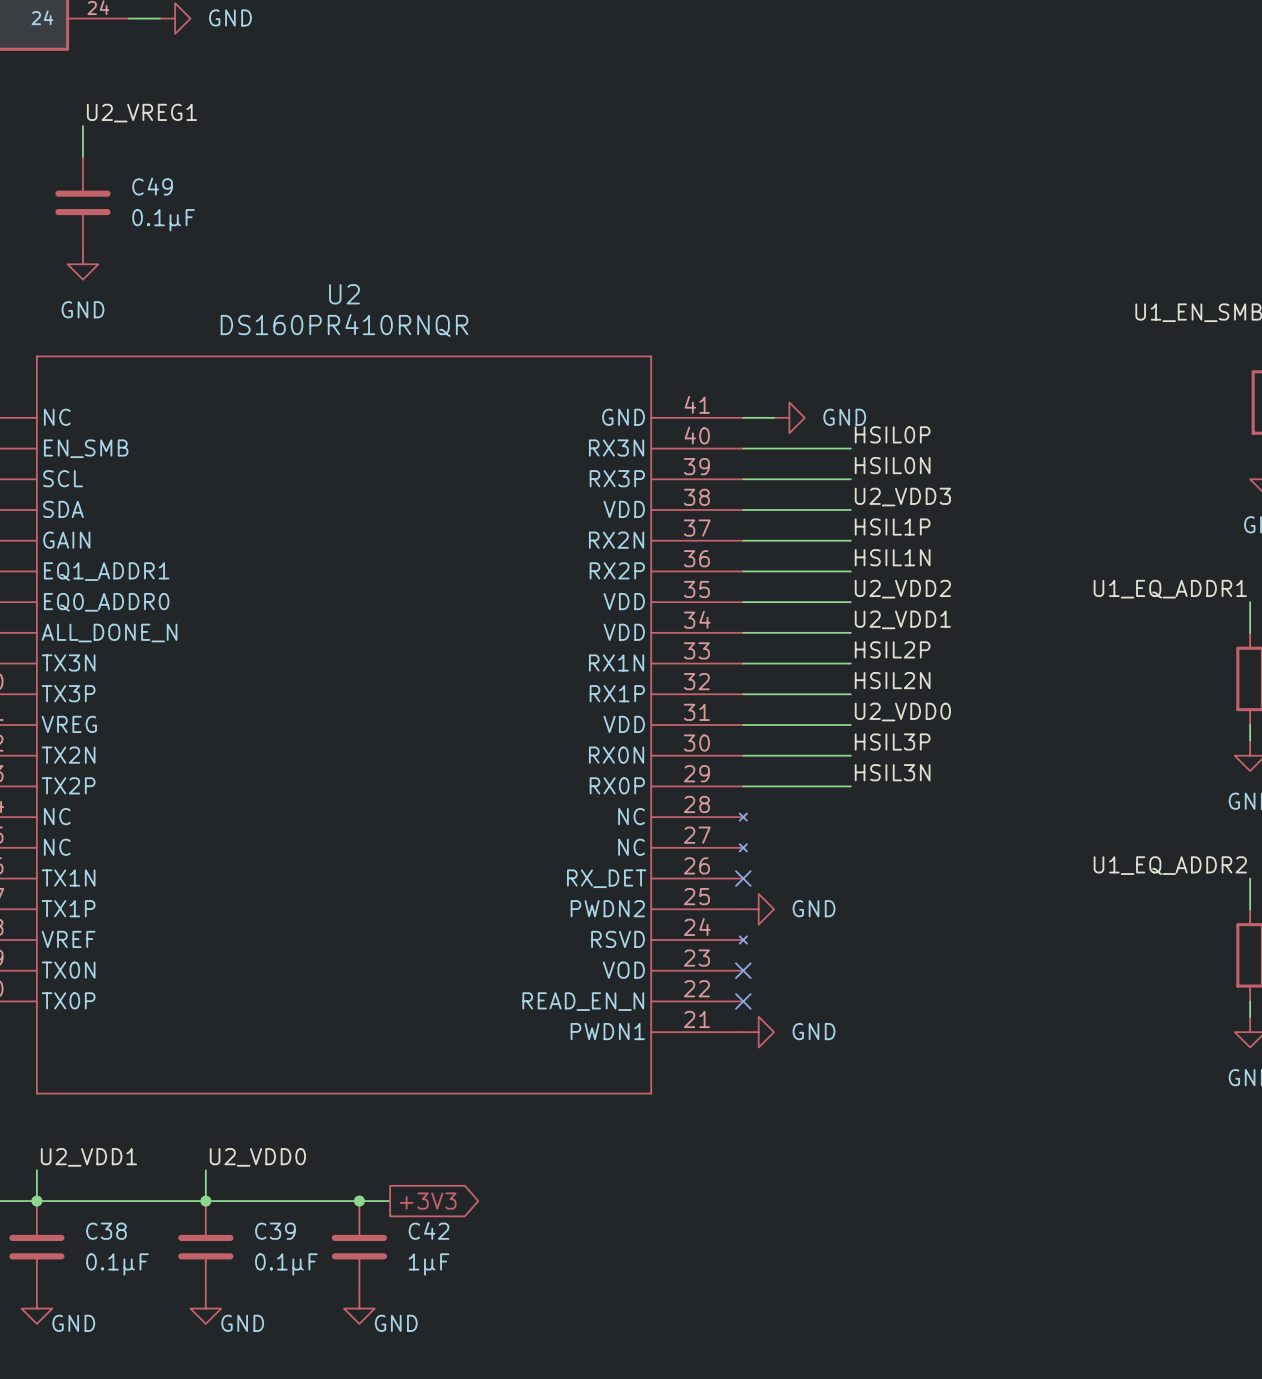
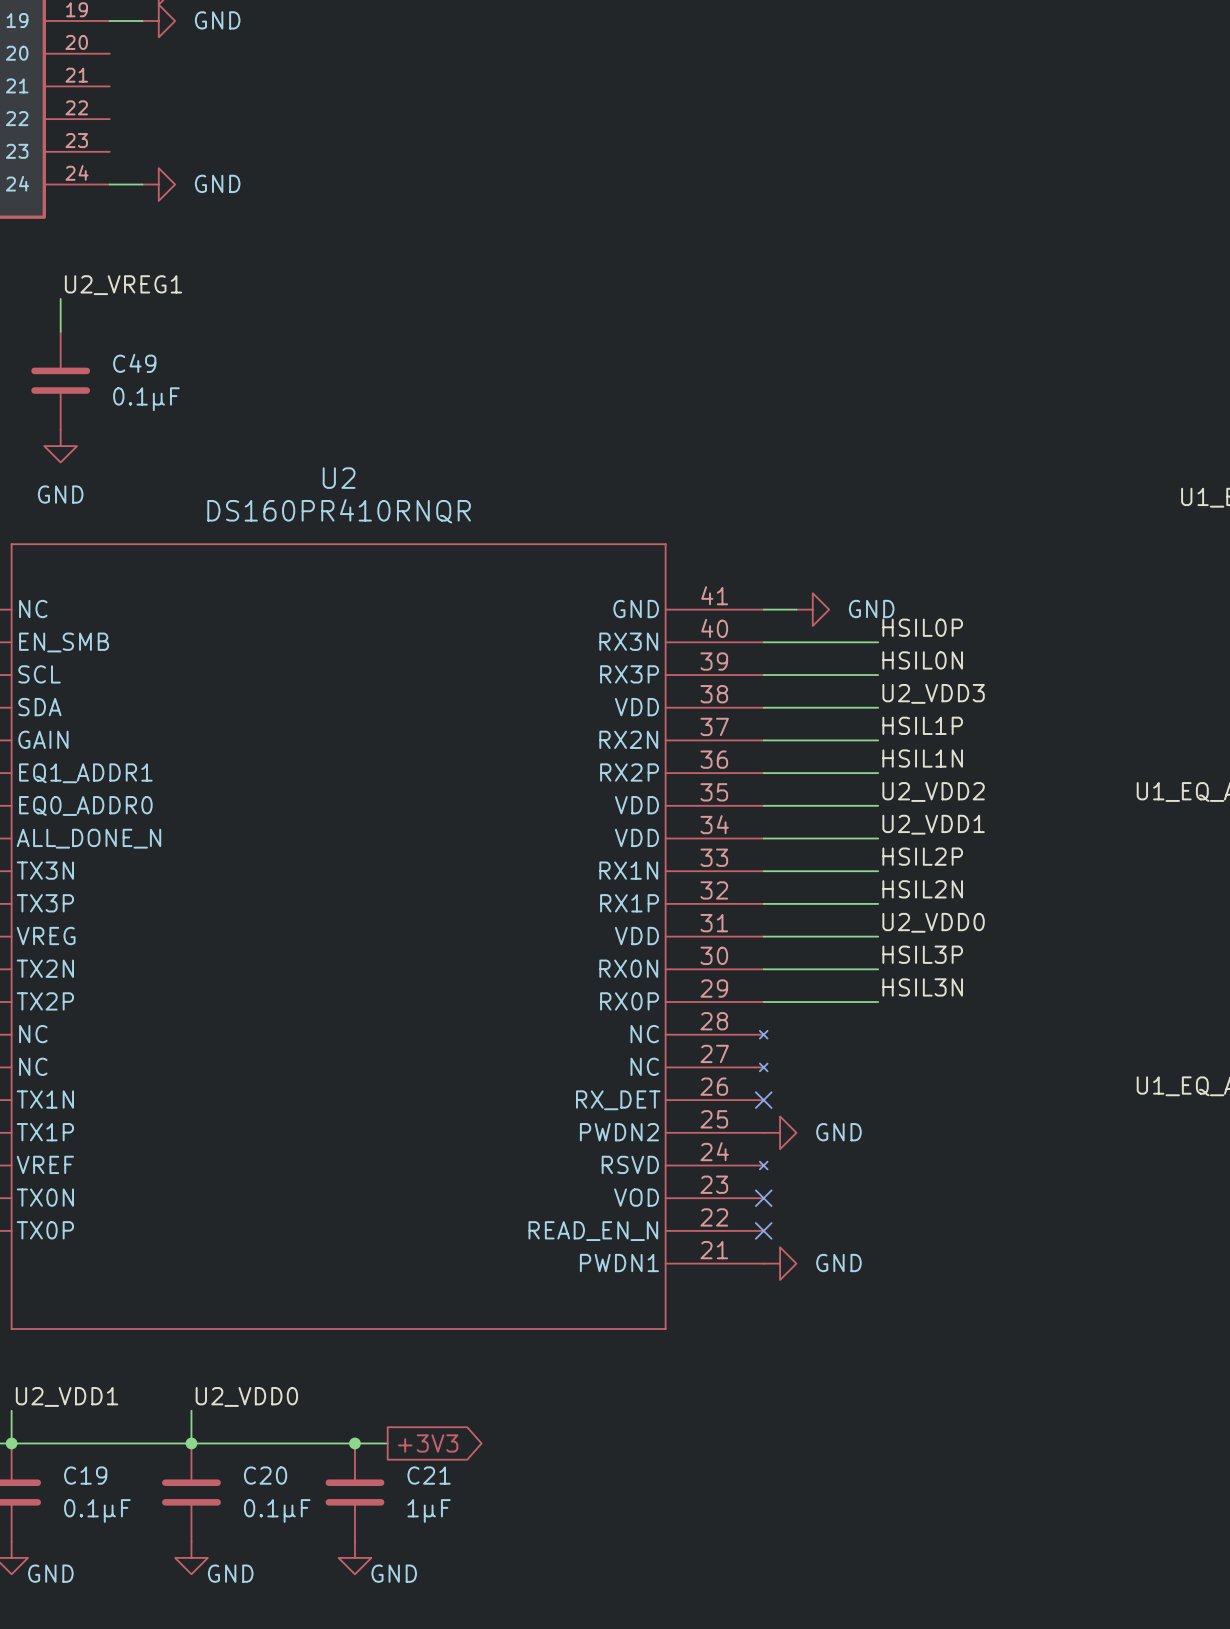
C42 name: C42 (428, 1230) -> C21 (429, 1475)
C38 name: C38 (106, 1231) -> C19 (85, 1475)
C39 name: C39 (275, 1231) -> C20 (265, 1475)

